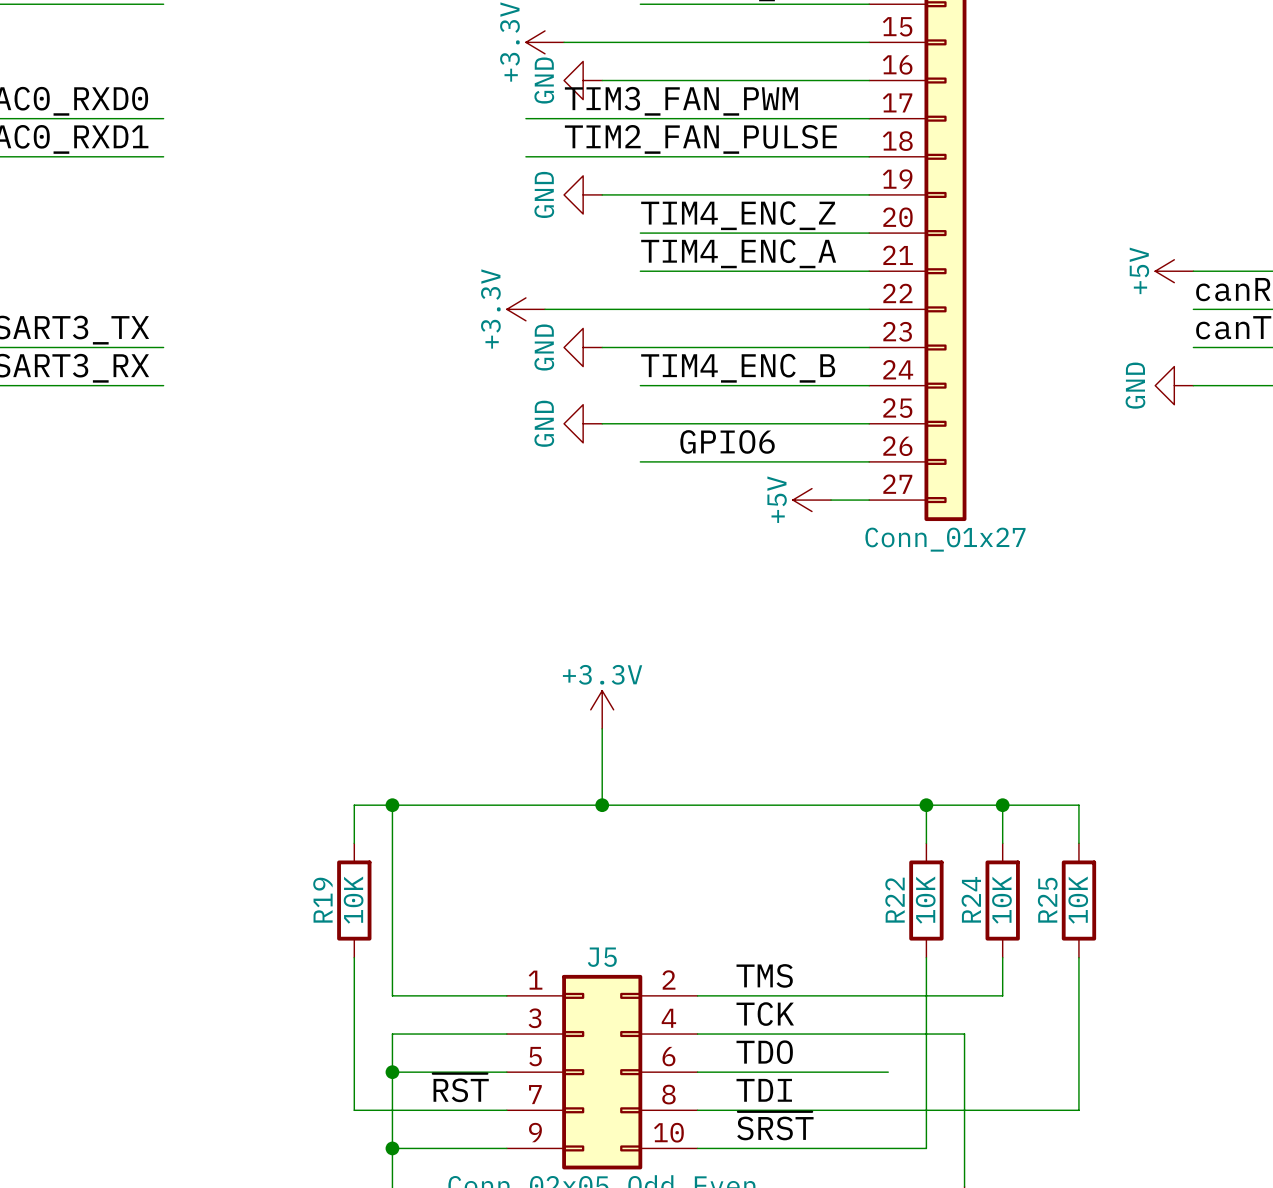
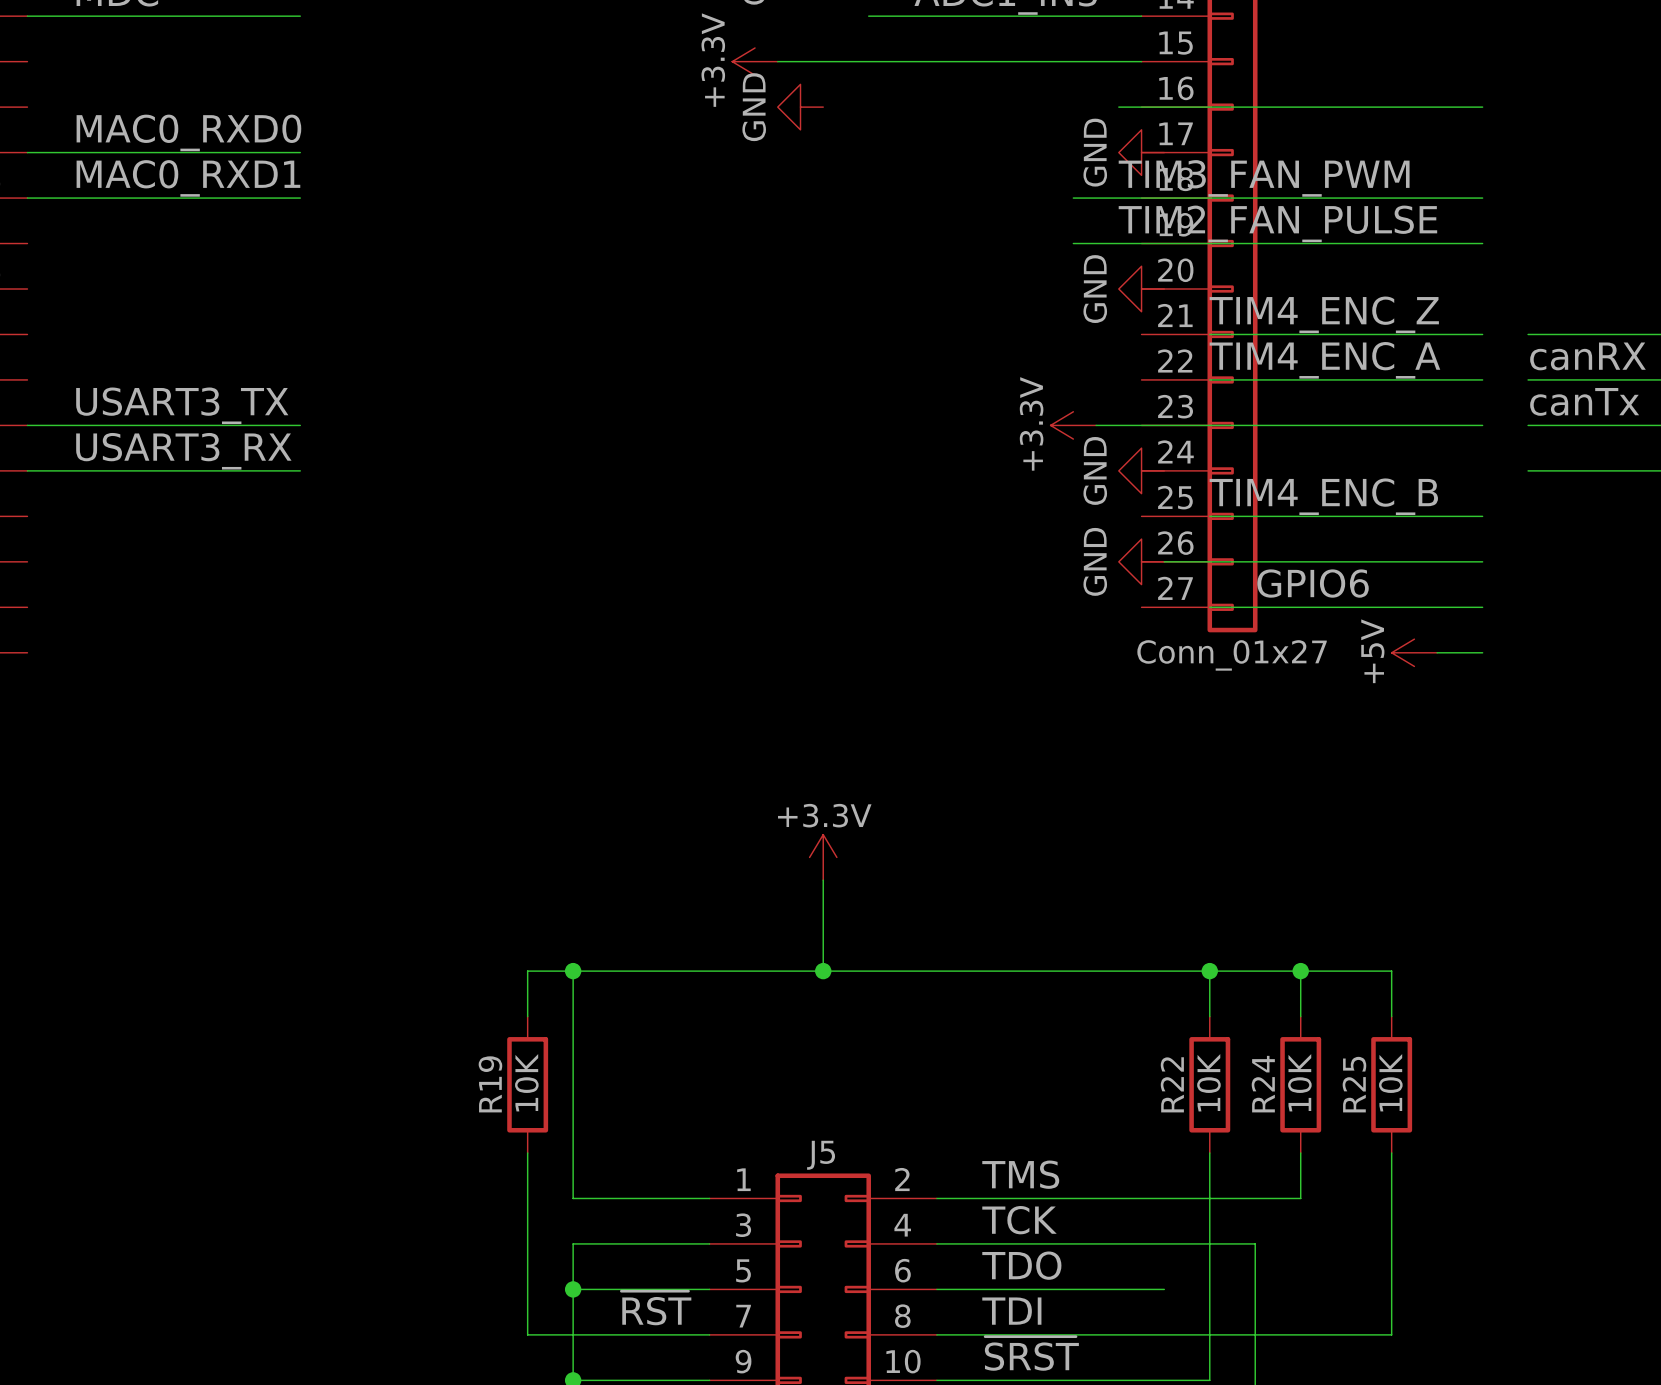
wire: (602, 80) (850, 80) -> none
wire: none -> (1141, 107) (1482, 107)
label position: TIM3_FAN_PWM (681, 101) -> TIM3_FAN_PWM (1264, 178)
wire: (525, 118) (869, 118) -> none
power symbol: none -> GND (1141, 152)
label position: TIM2_FAN_PULSE (700, 139) -> TIM2_FAN_PULSE (1277, 223)
wire: (525, 156) (811, 156) -> (1141, 198) (1482, 198)
power symbol: GND (583, 194) -> none
wire: (602, 194) (811, 194) -> none
wire: none -> (1141, 243) (1482, 243)
label position: TIM4_ENC_Z (738, 215) -> TIM4_ENC_Z (1324, 314)
wire: (640, 233) (869, 233) -> (1209, 334) (1482, 334)
power symbol: none -> GND (1141, 289)
label position: TIM4_ENC_A (738, 253) -> TIM4_ENC_A (1324, 360)
wire: (640, 271) (869, 271) -> (1209, 379) (1482, 379)
power symbol: +5V (1174, 271) -> none
power symbol position: +3.3V (525, 309) -> +3.3V (1073, 425)
wire: (545, 309) (869, 309) -> none
power symbol: GND (583, 347) -> none
wire: (602, 347) (831, 347) -> none
wire: none -> (1141, 425) (1482, 425)
label position: TIM4_ENC_B (738, 368) -> TIM4_ENC_B (1323, 496)
wire: (640, 385) (869, 385) -> (1209, 516) (1482, 516)
power symbol: none -> GND (1141, 470)
power symbol: GND (1174, 385) -> none
power symbol: GND (583, 423) -> none
wire: (602, 423) (869, 423) -> (1164, 561) (1482, 561)
label position: GPIO6 (727, 441) -> GPIO6 (1313, 583)
wire: (640, 461) (869, 461) -> (1209, 607) (1482, 607)
power symbol: none -> GND (1141, 561)
power symbol: +5V (811, 500) -> none
wire: (831, 500) (869, 500) -> (1437, 652) (1482, 652)
power symbol: none -> +5V (1414, 652)

